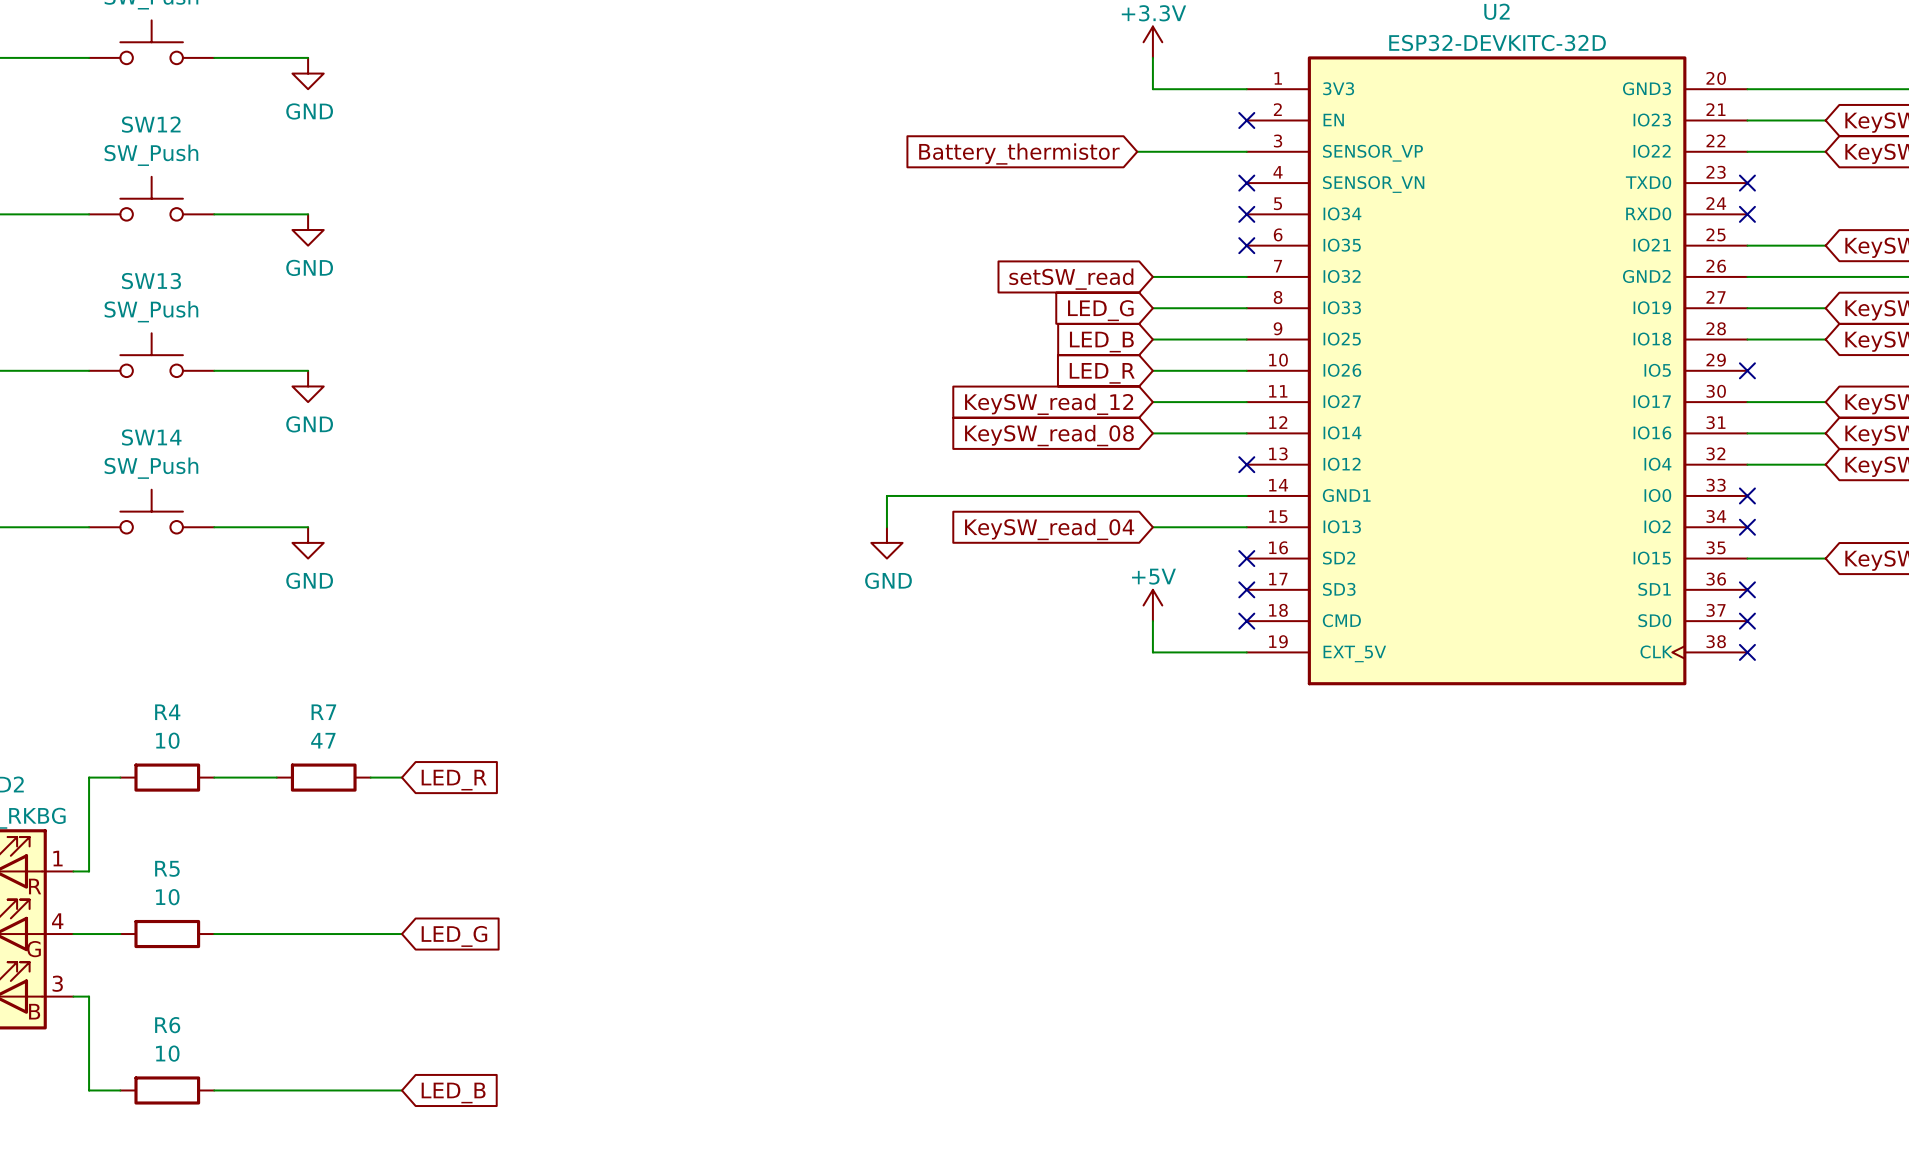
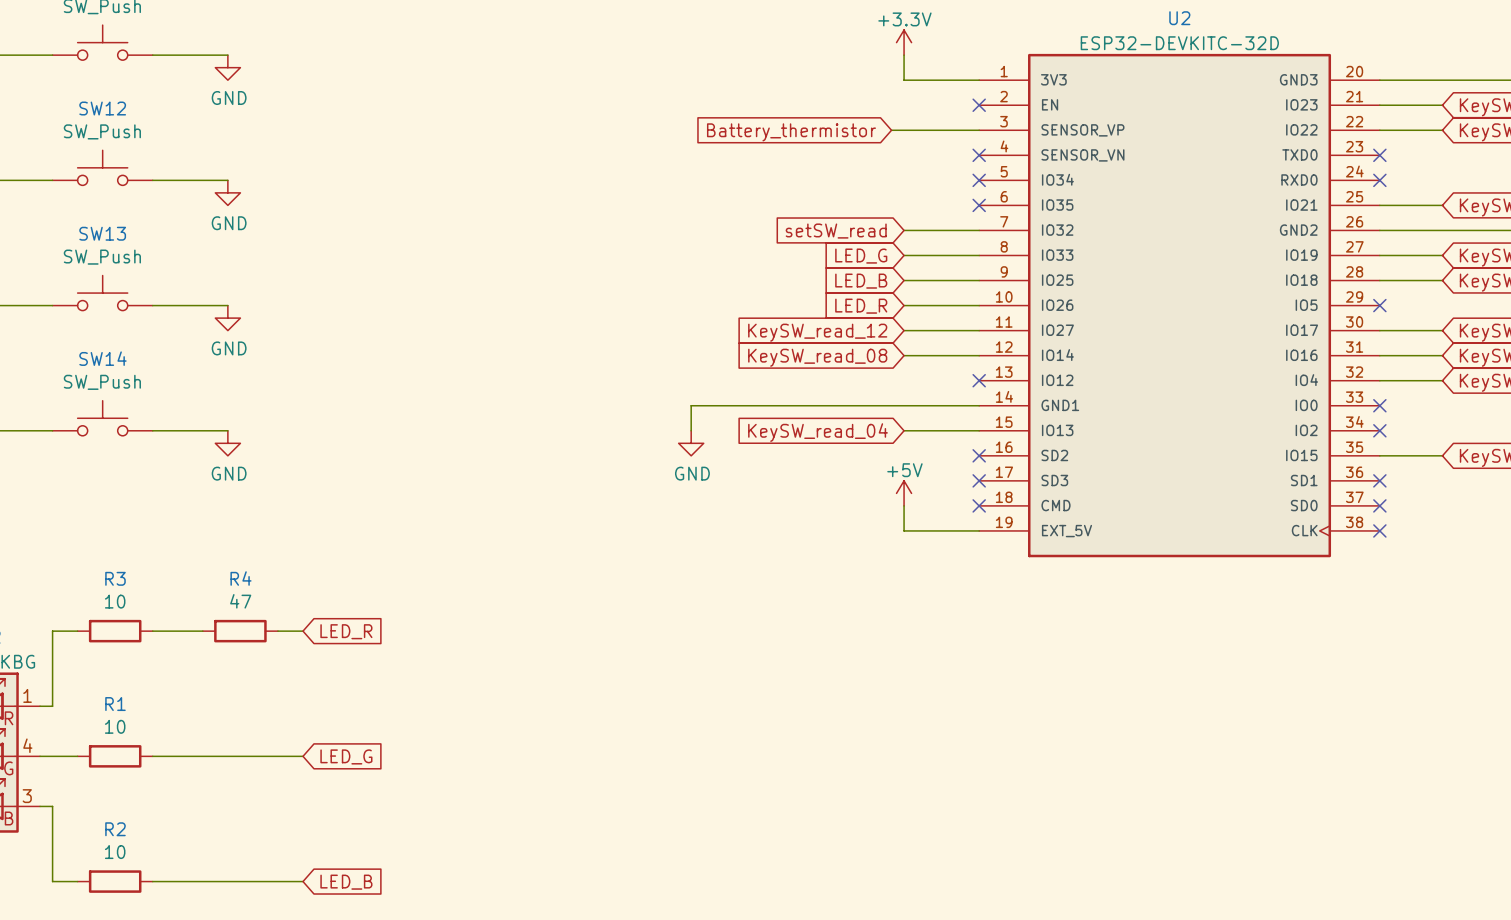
R4 name: R4 (167, 712) -> R3 (115, 578)
R7 name: R7 (323, 712) -> R4 (241, 578)
R5 name: R5 (167, 868) -> R1 (115, 704)
R6 name: R6 (167, 1025) -> R2 (115, 829)

